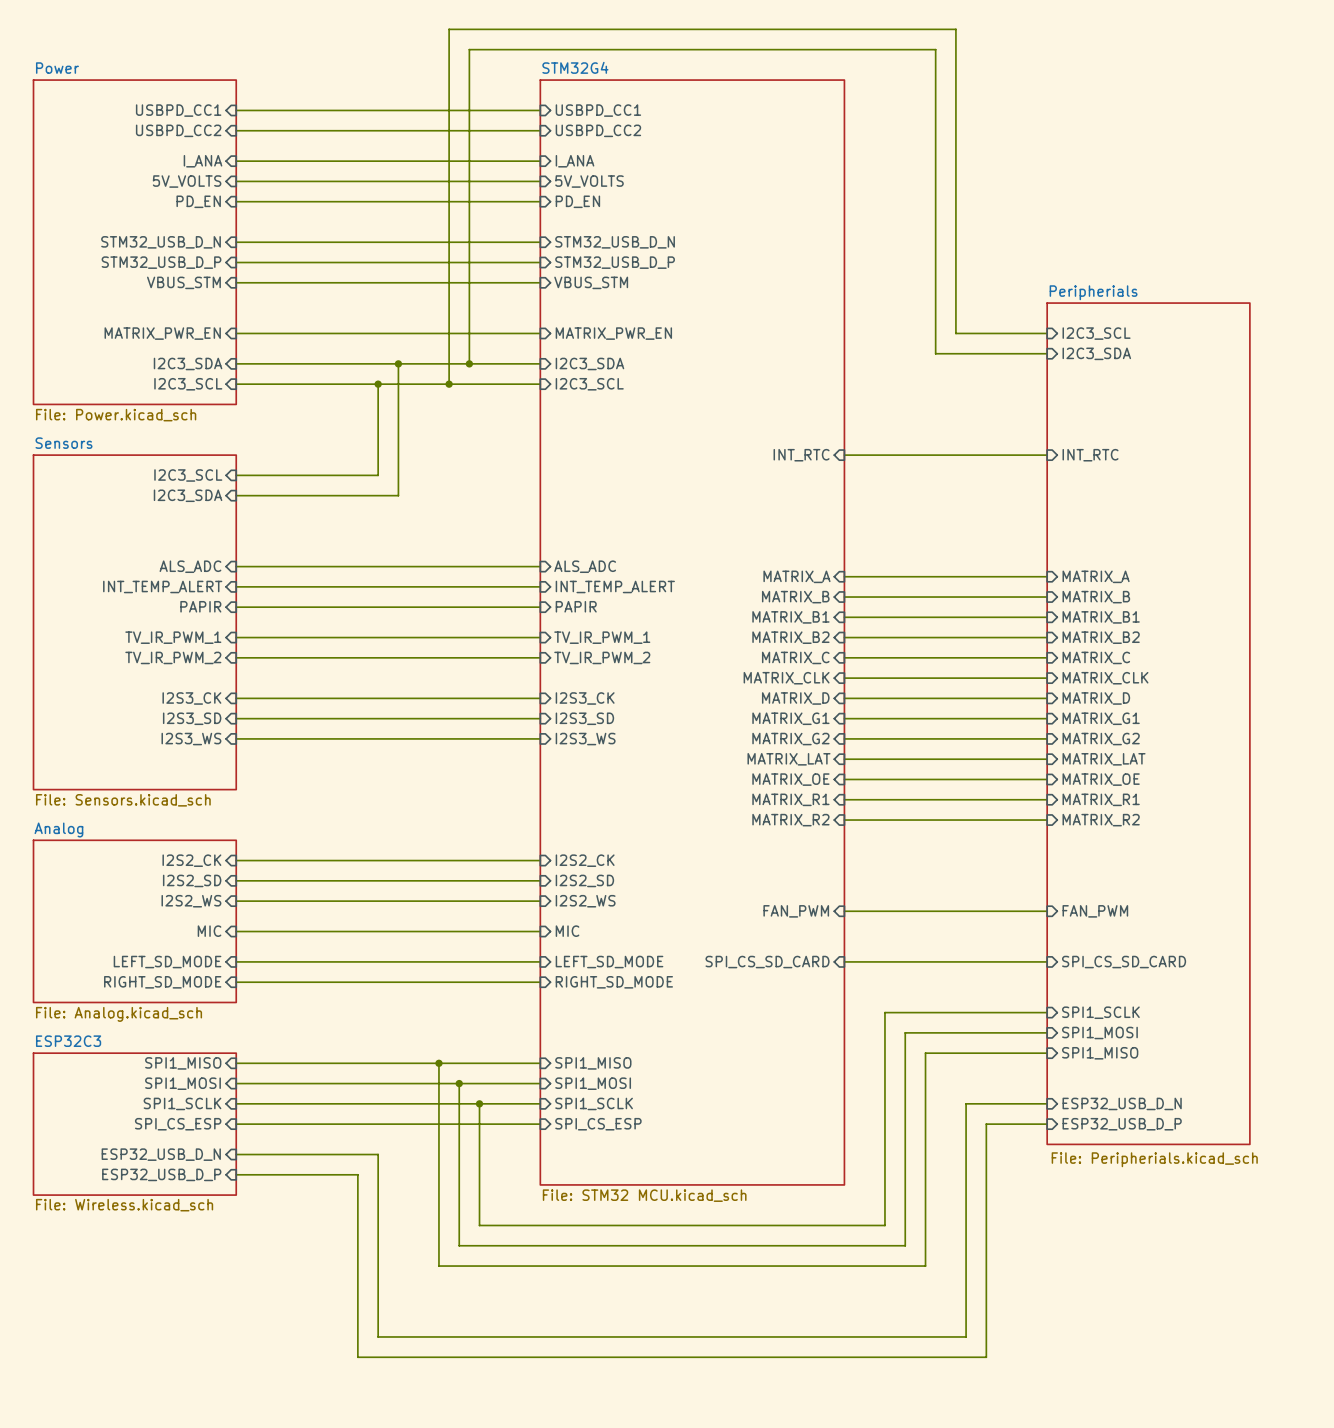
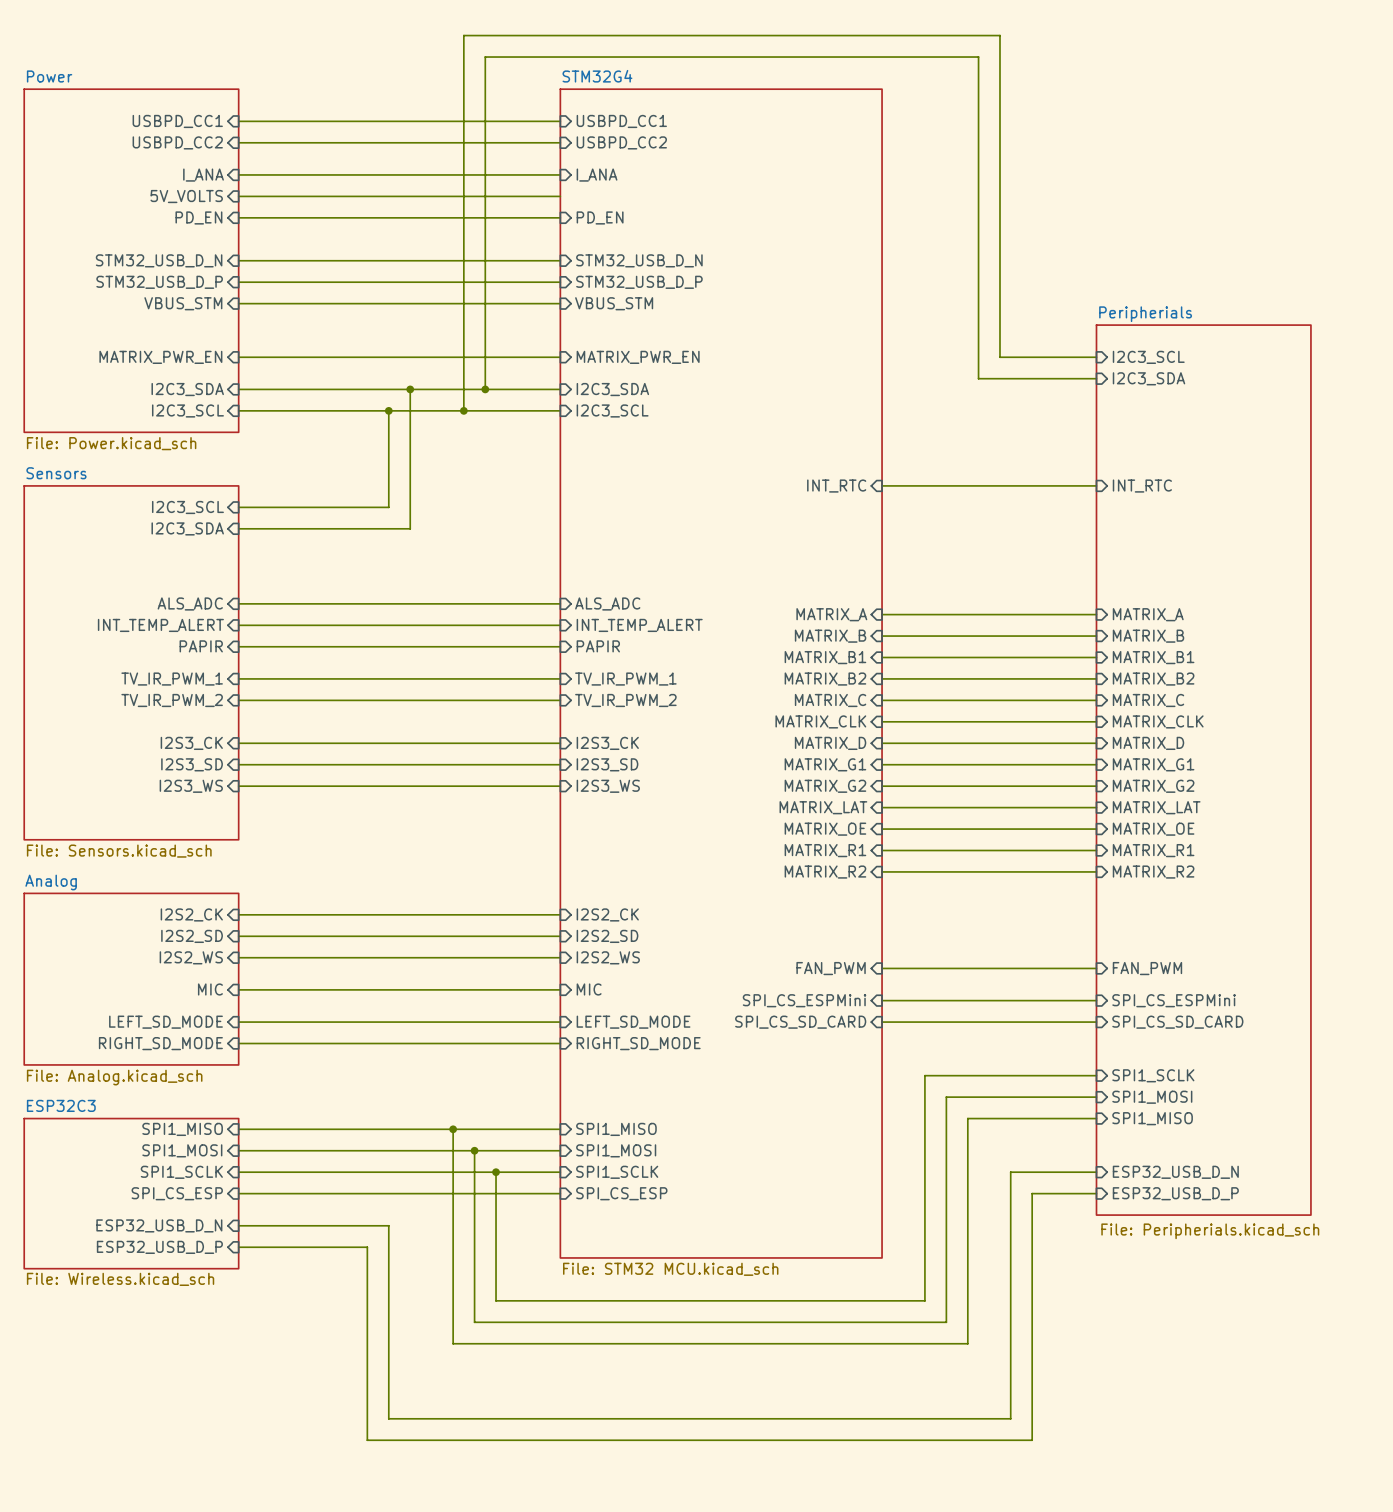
sheet pin: 5V_VOLTS (589, 181) -> none
sheet pin: none -> SPI_CS_ESPMini (804, 1000)
wire: none -> (882, 1000) (1096, 1000)
sheet pin: none -> SPI_CS_ESPMini (1174, 1000)

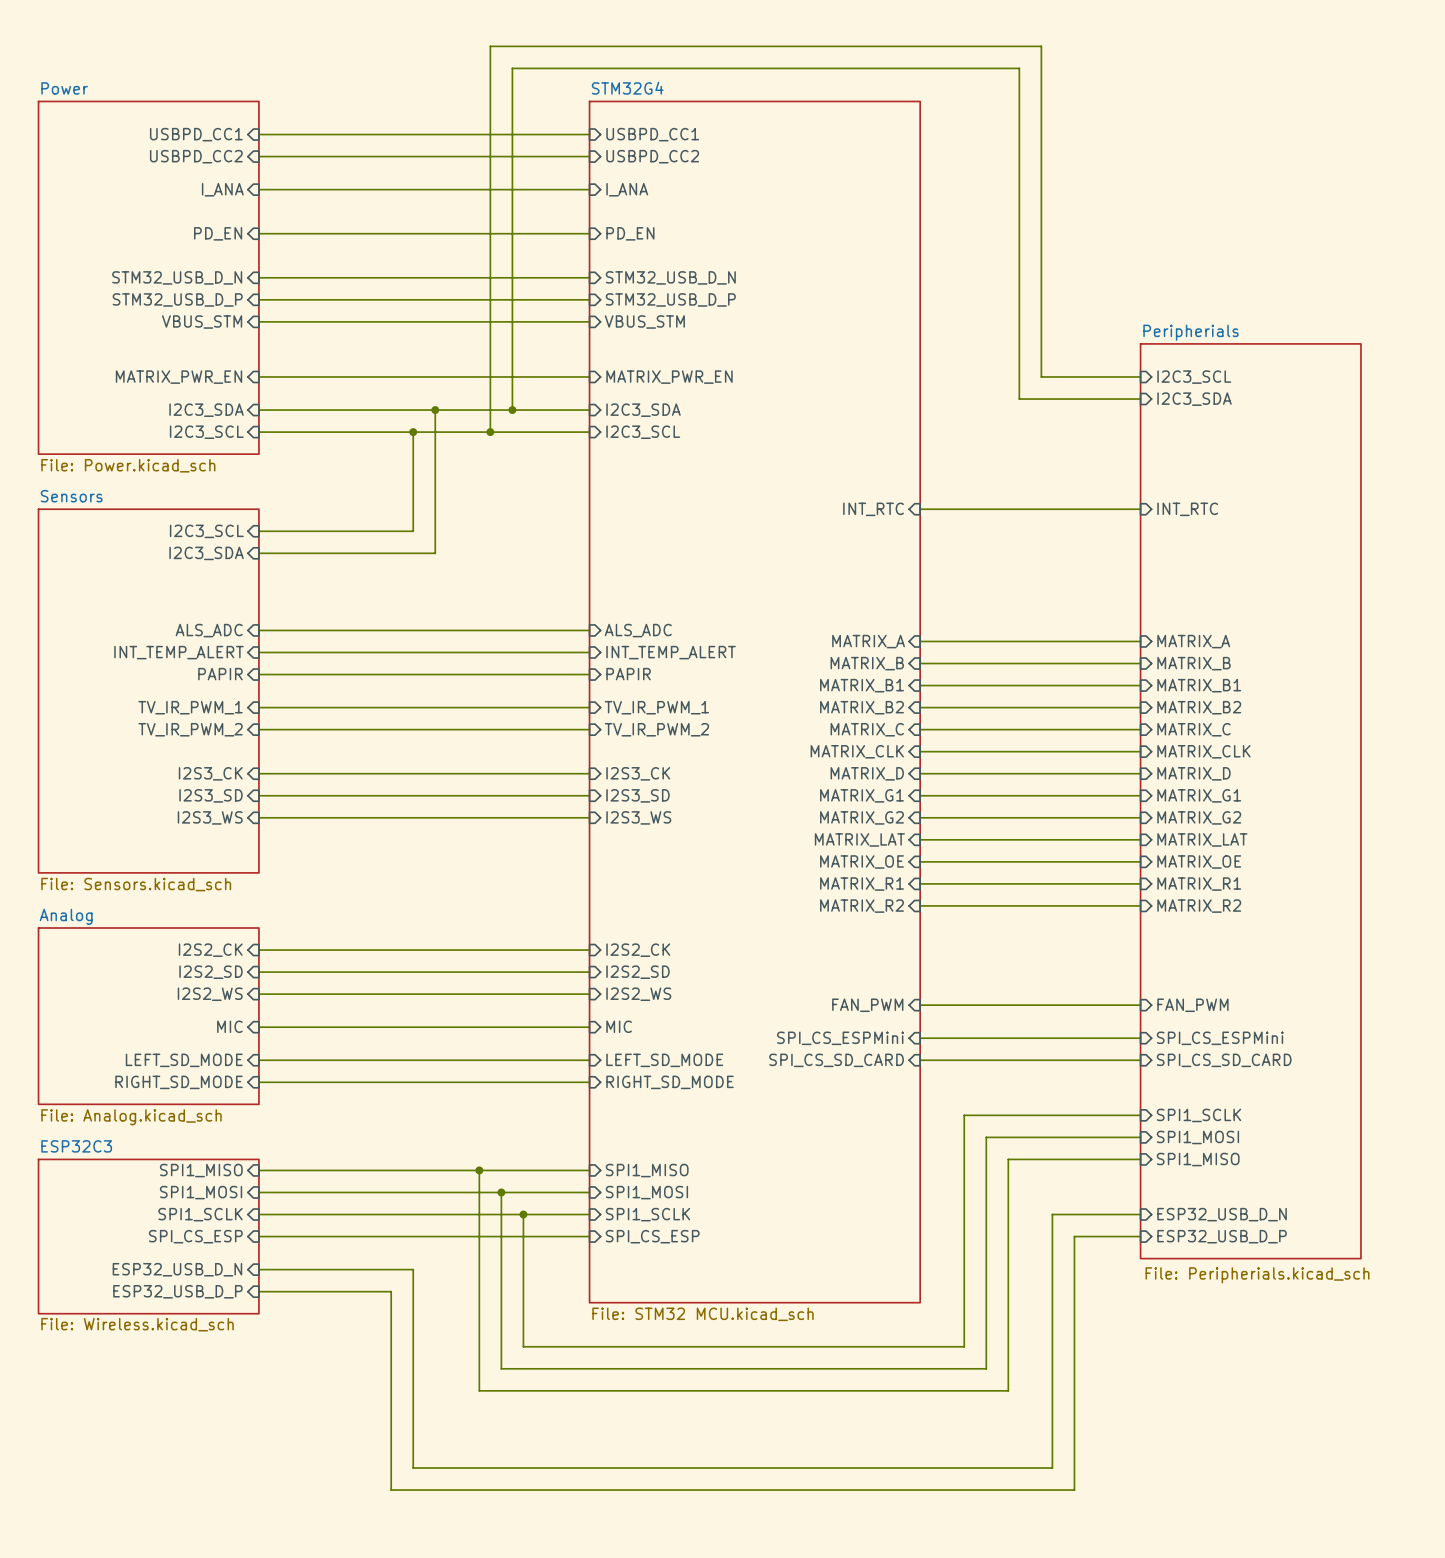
sheet pin: 5V_VOLTS (186, 196) -> none
wire: (238, 196) (560, 196) -> none

